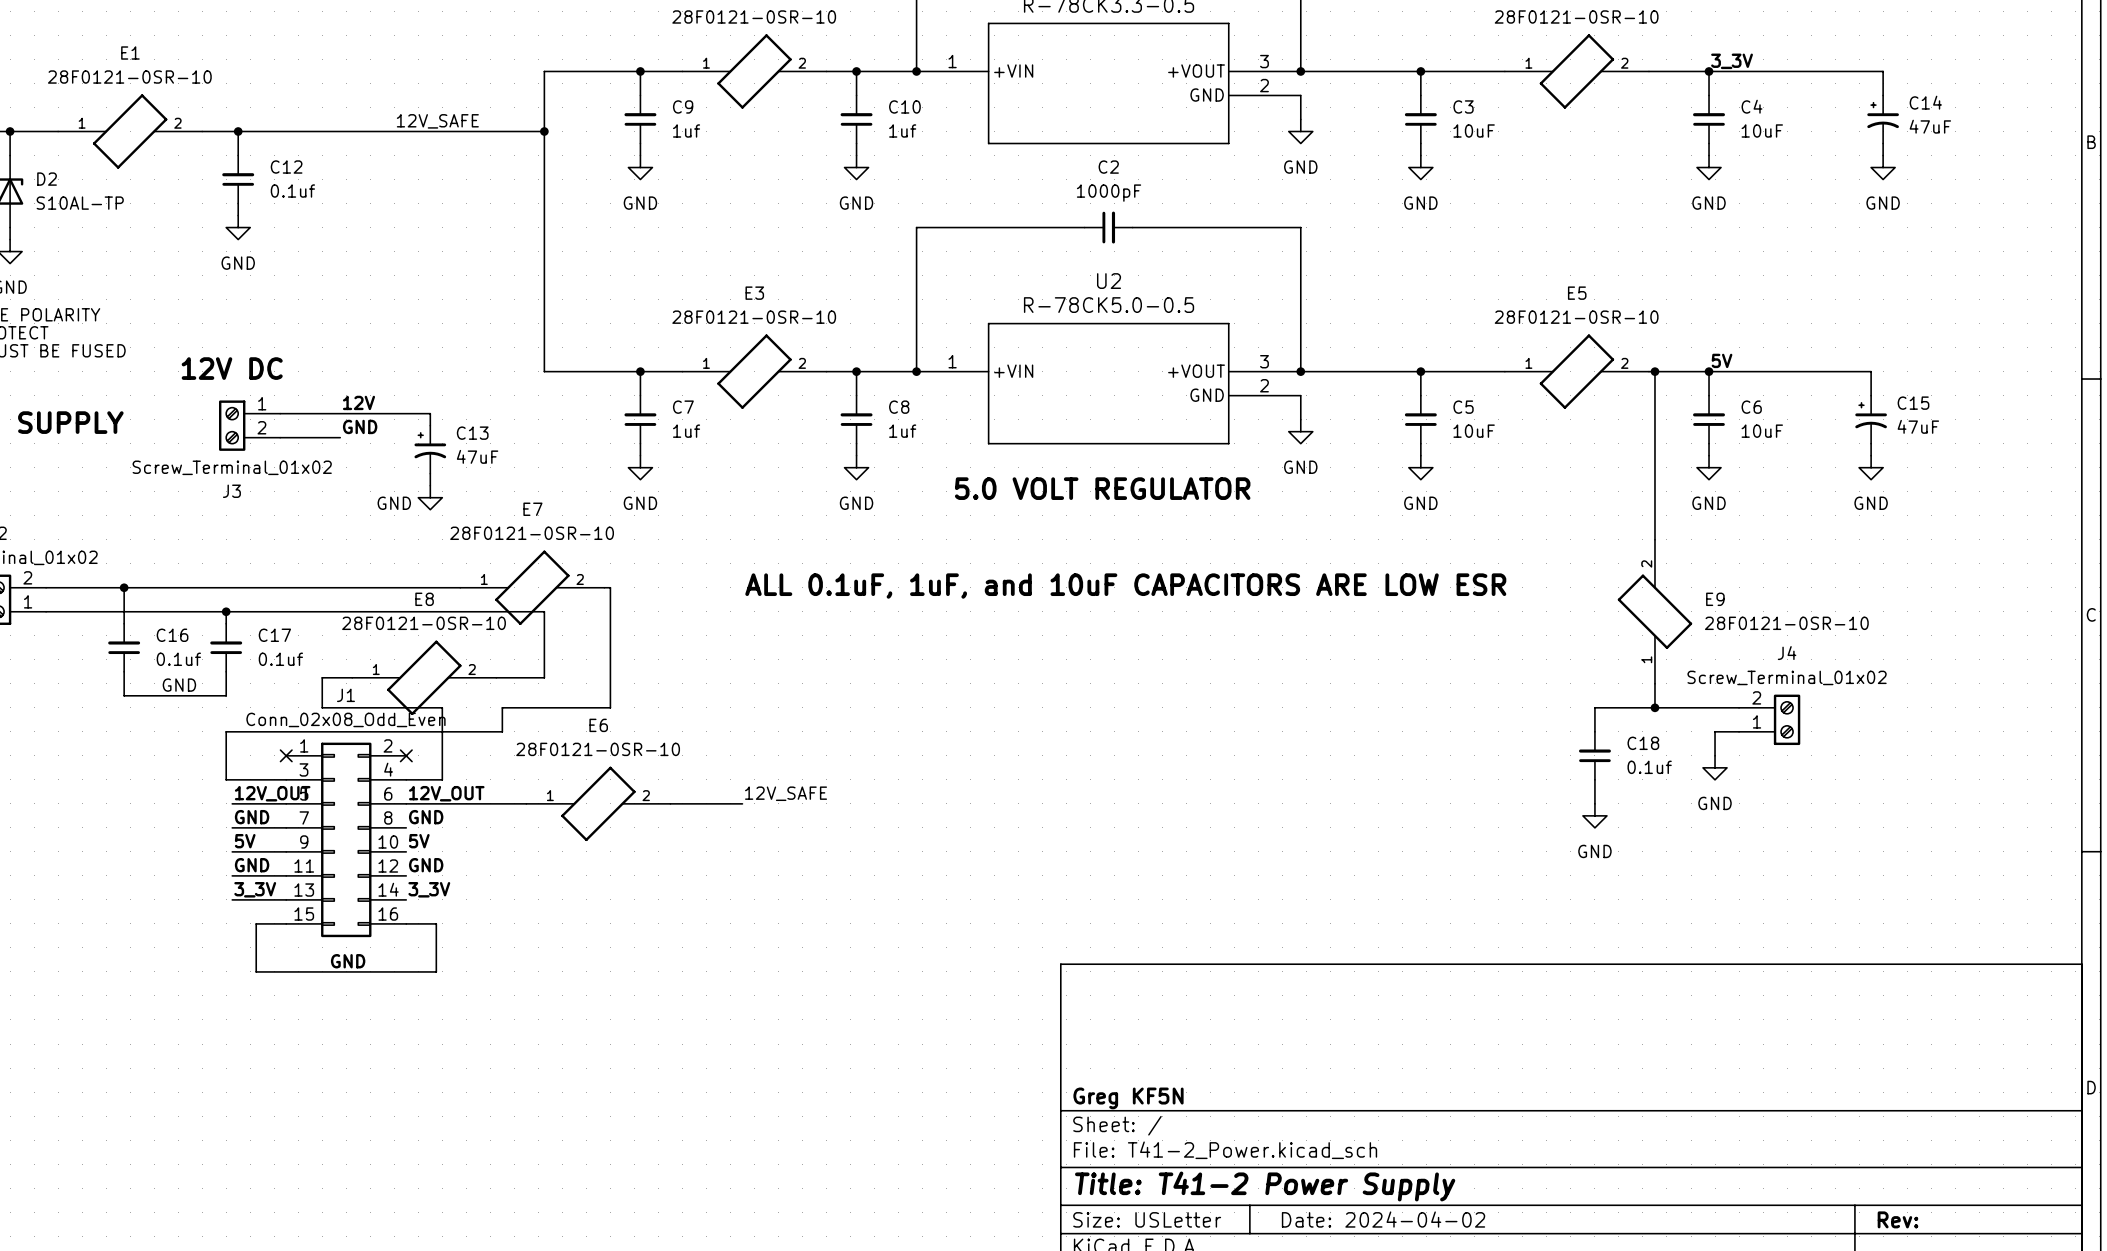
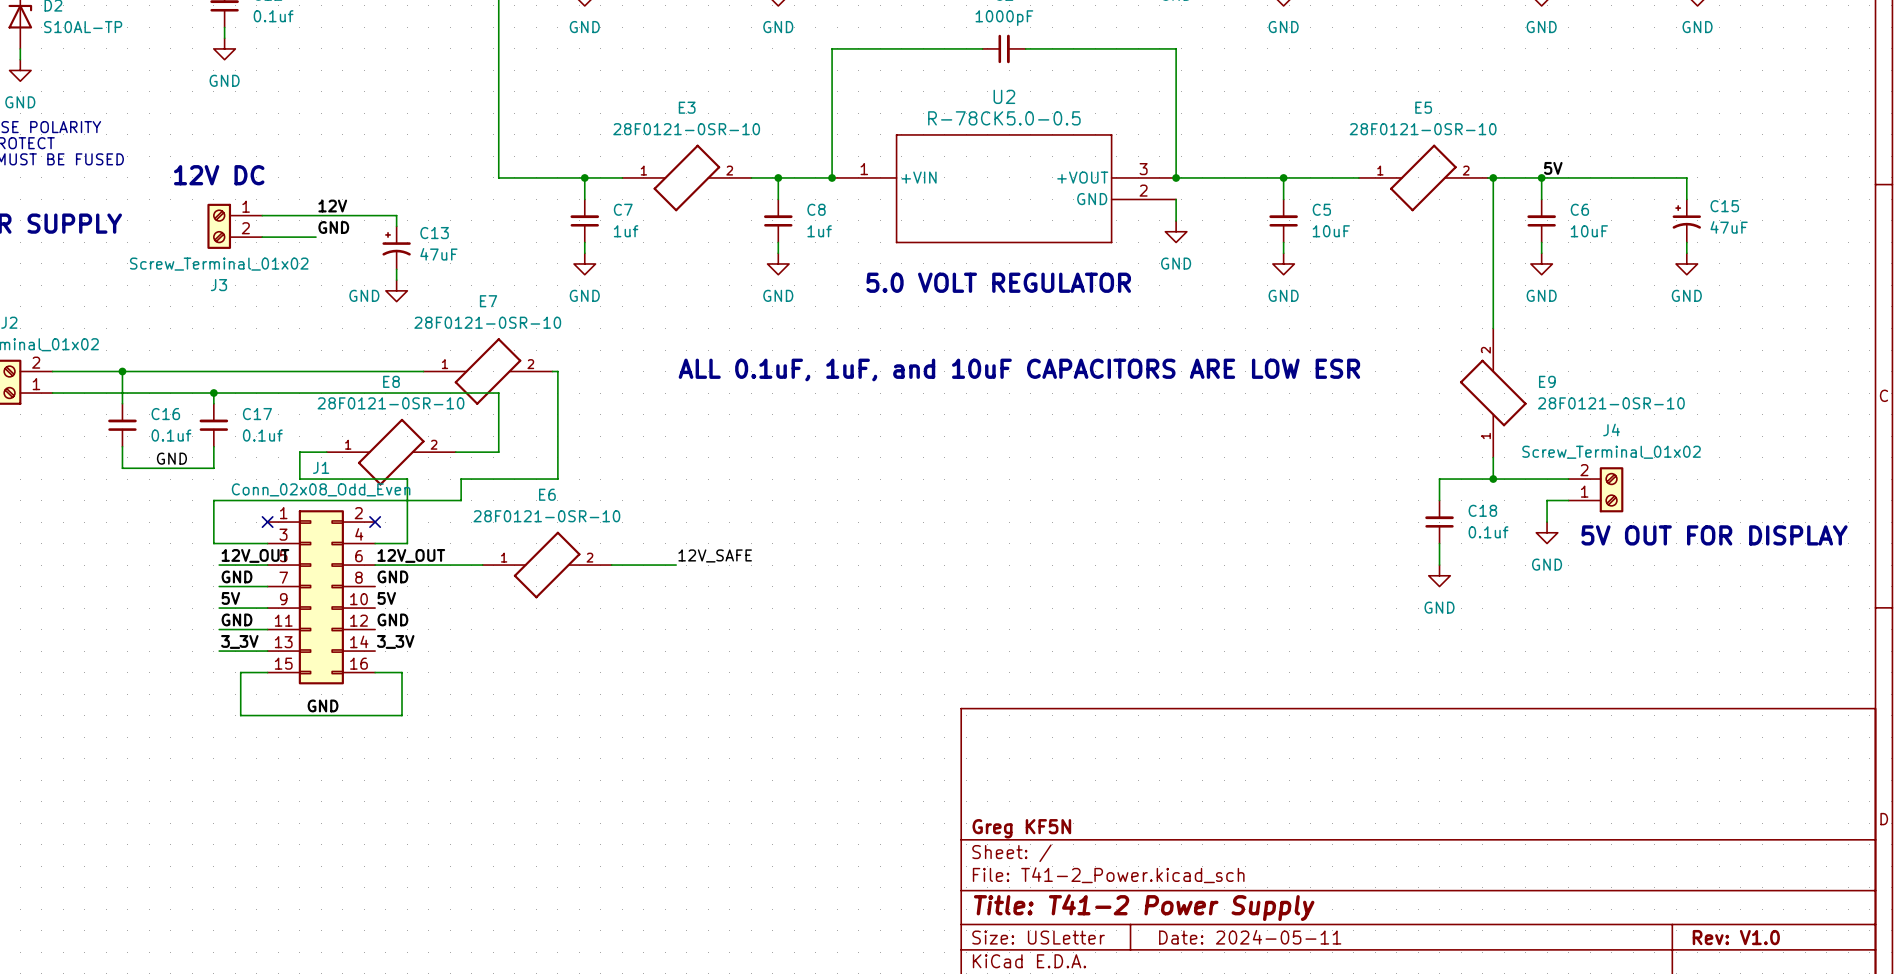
text: none -> 5V OUT FOR DISPLAY (1714, 535)
title block: Date: 2024-04-02 (1383, 1219) -> Date: 2024-05-11 (1250, 937)
title block: Rev: (1897, 1219) -> Rev: V1.0 (1736, 937)

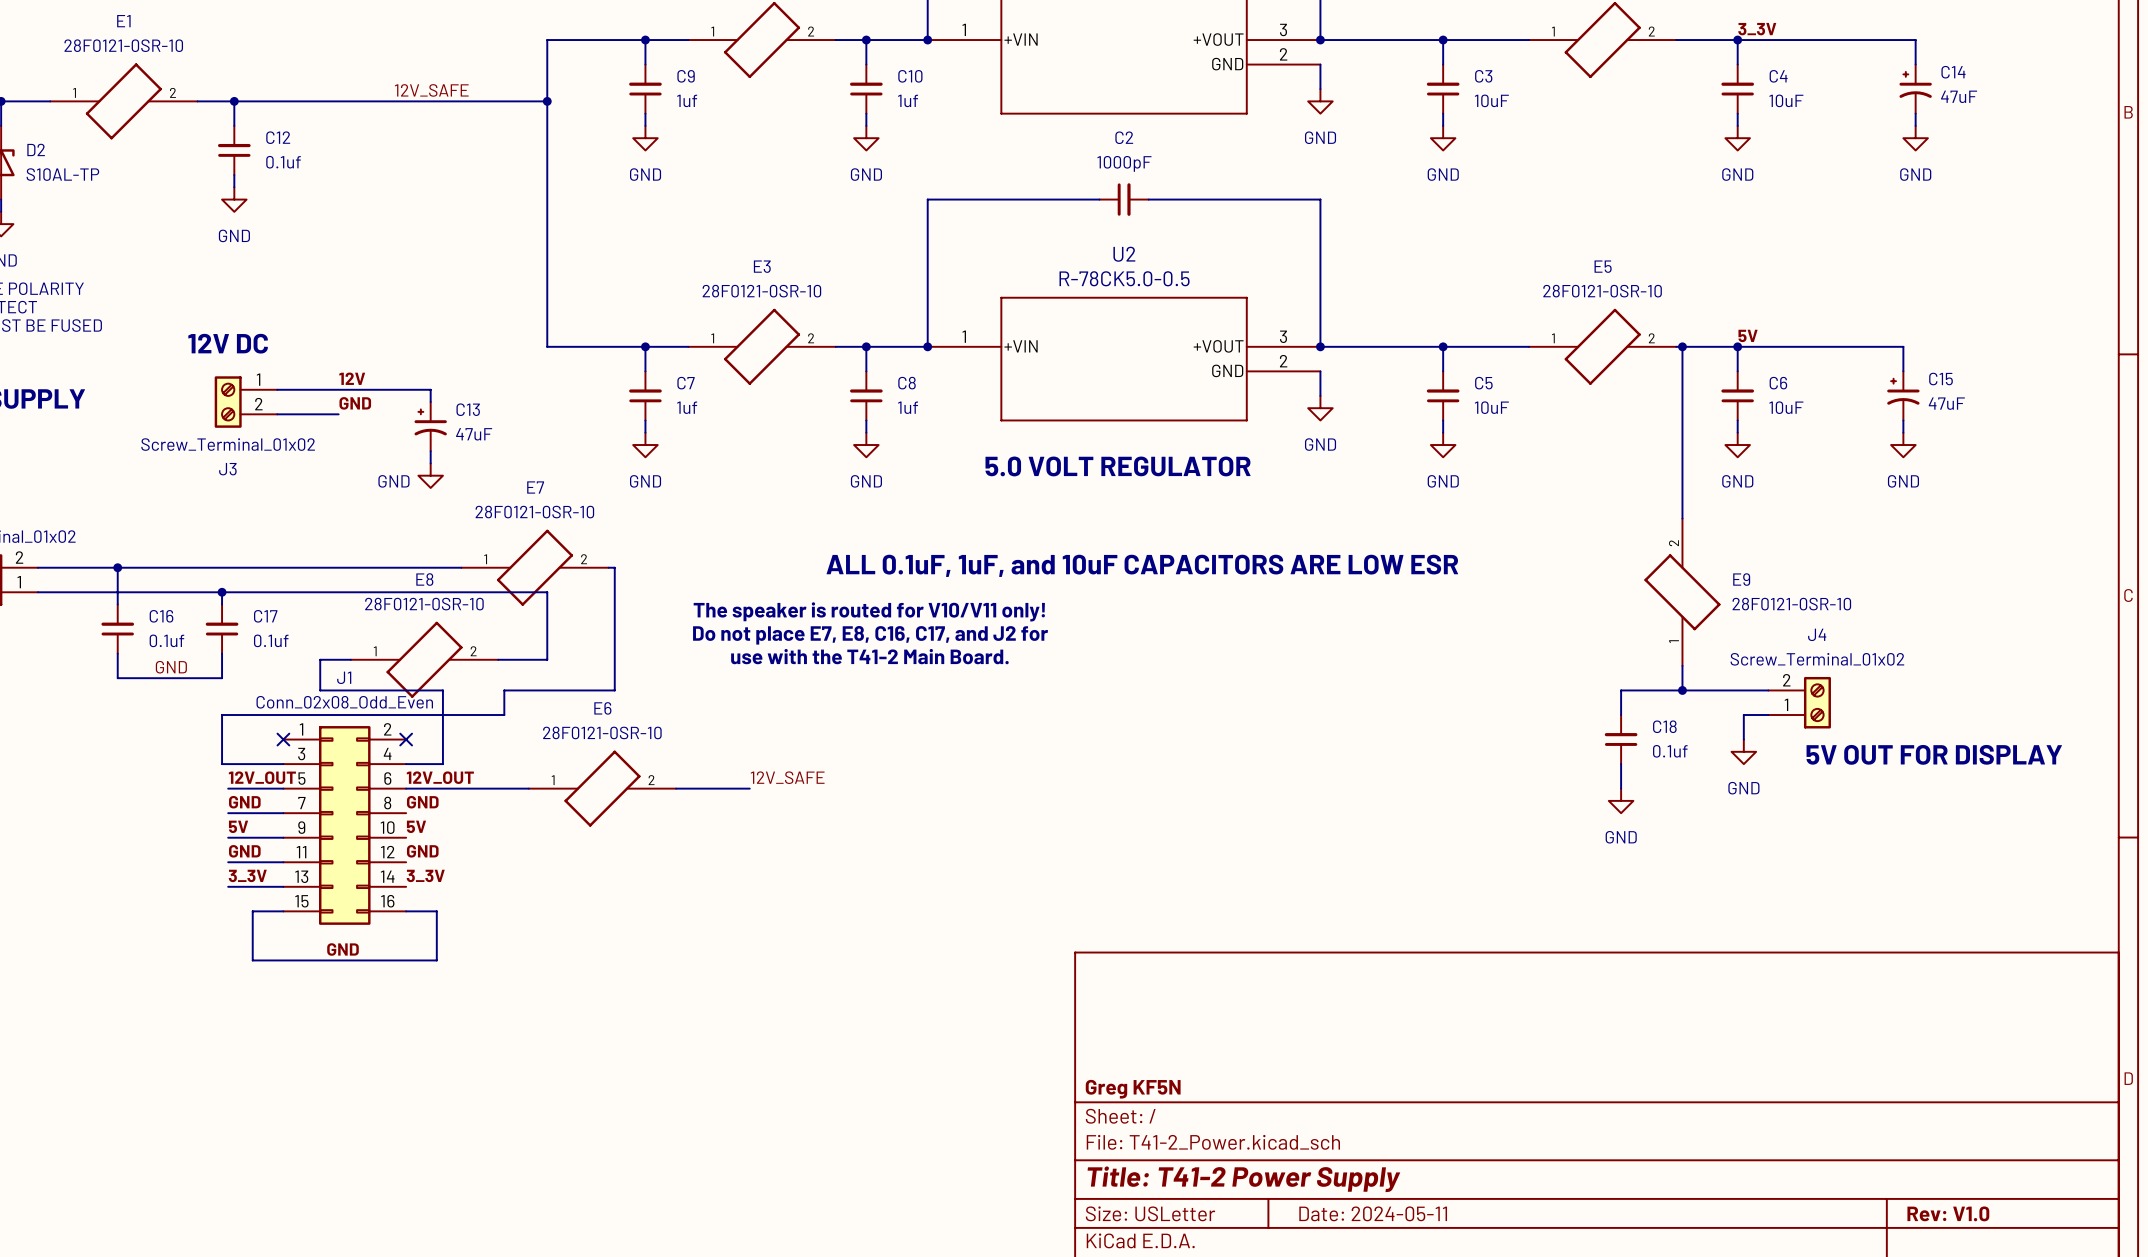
text: none -> The speaker is routed for V10/V11 only! (869, 611)
text: none -> Do not place E7, E8, C16, C17, and J2 for (870, 635)
text: none -> use with the T41-2 Main Board. (869, 656)

